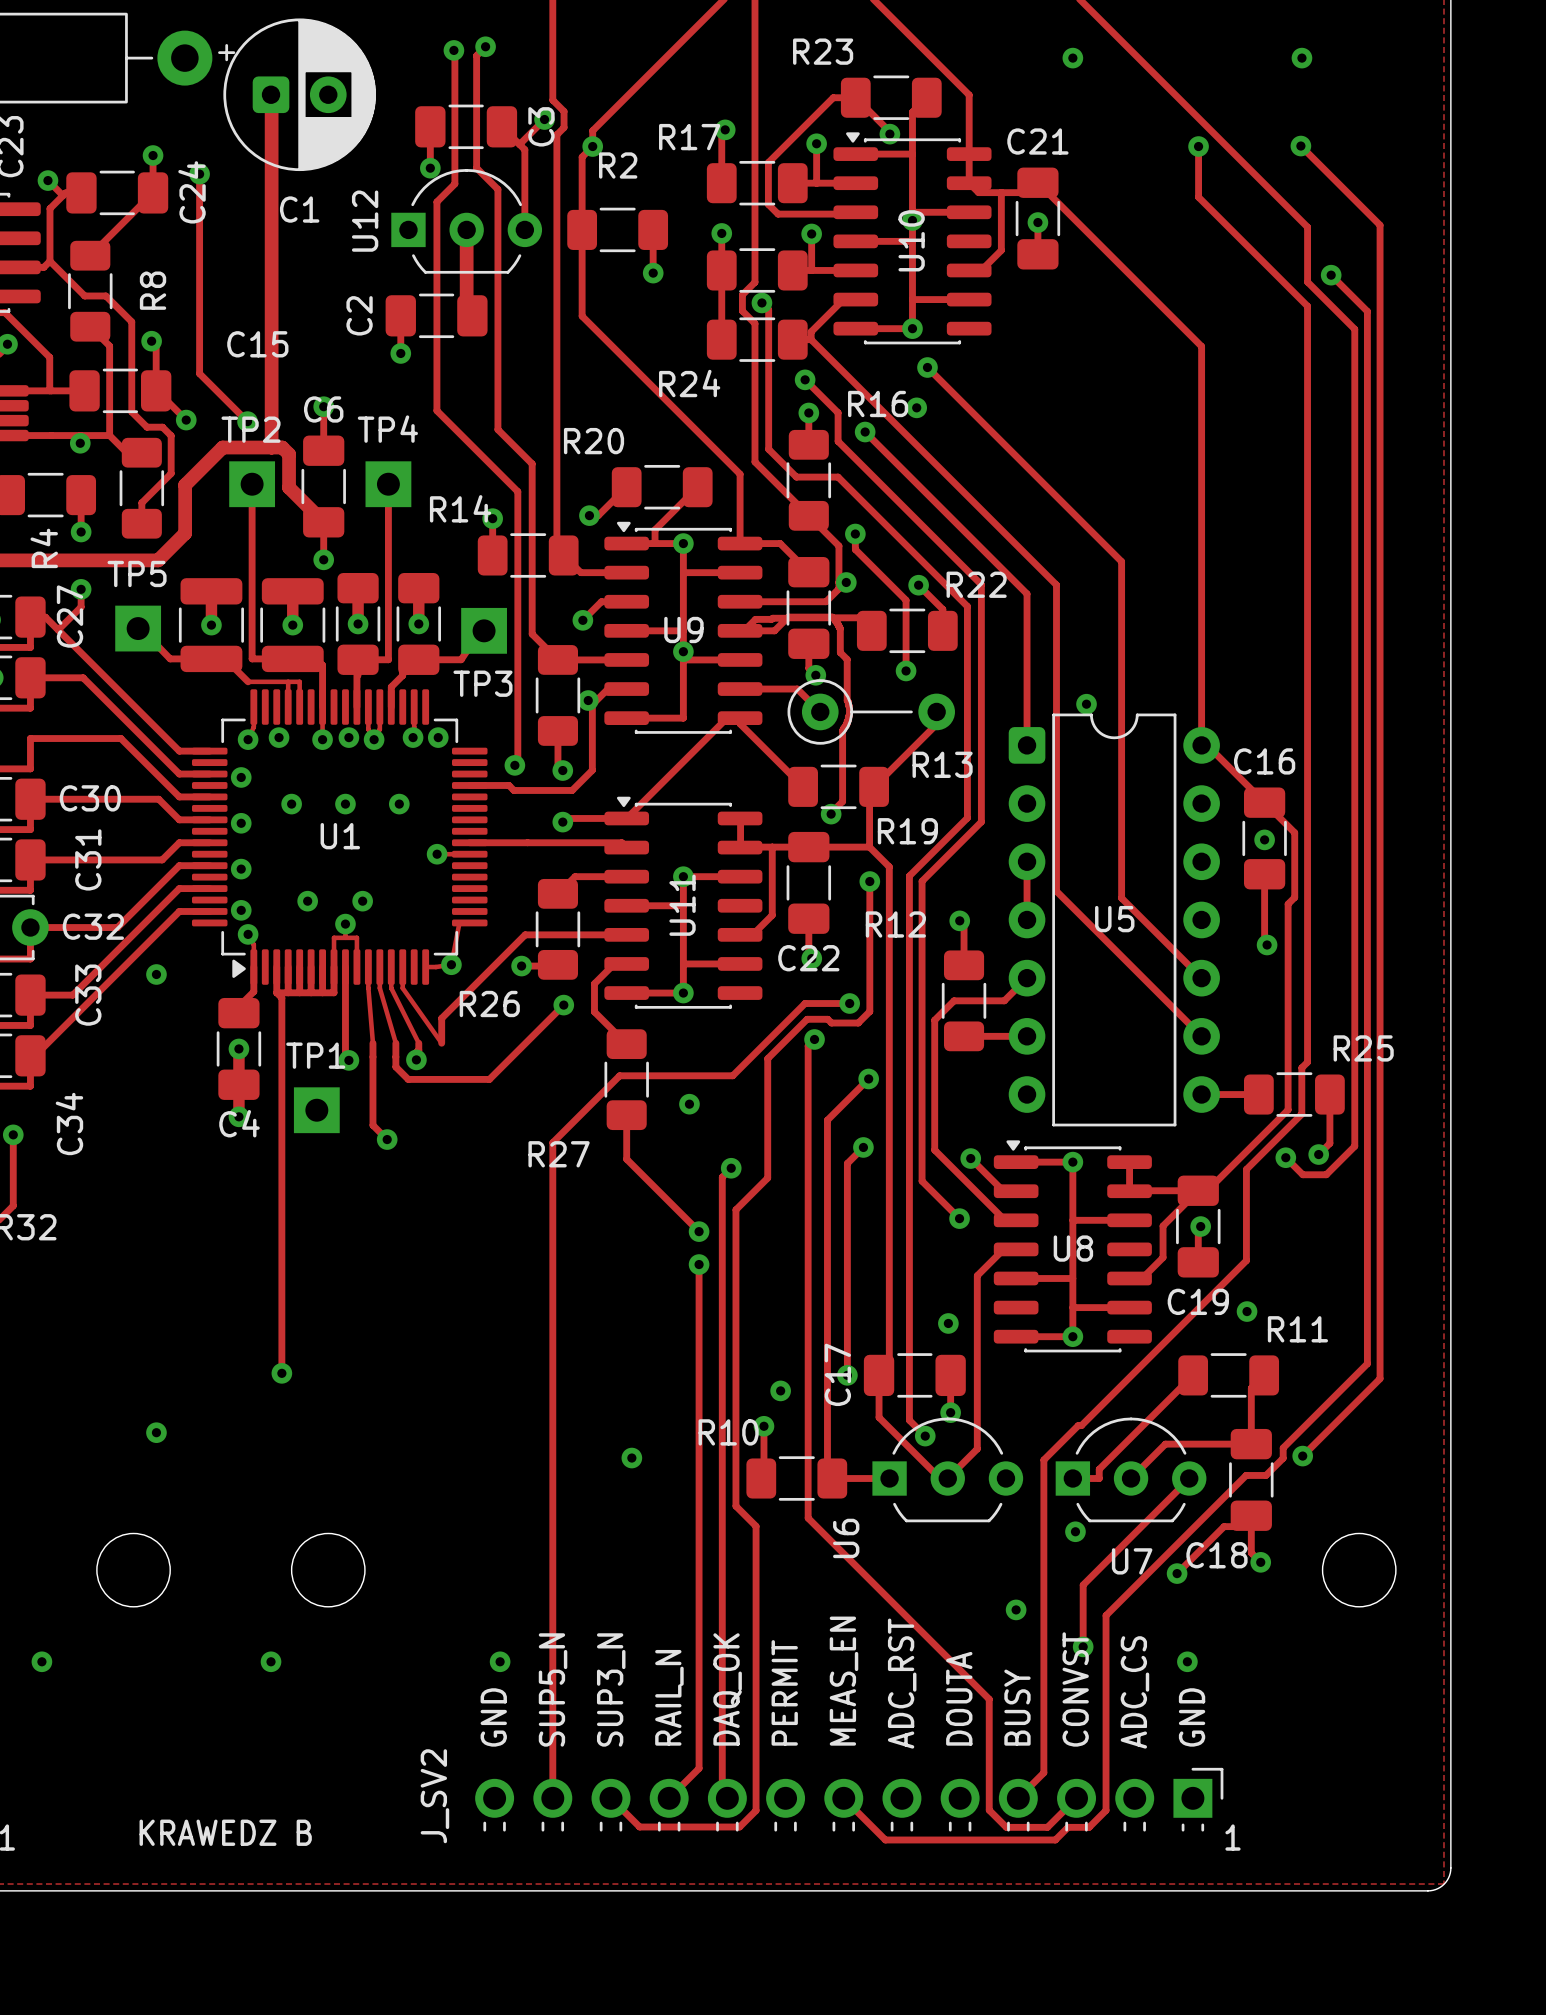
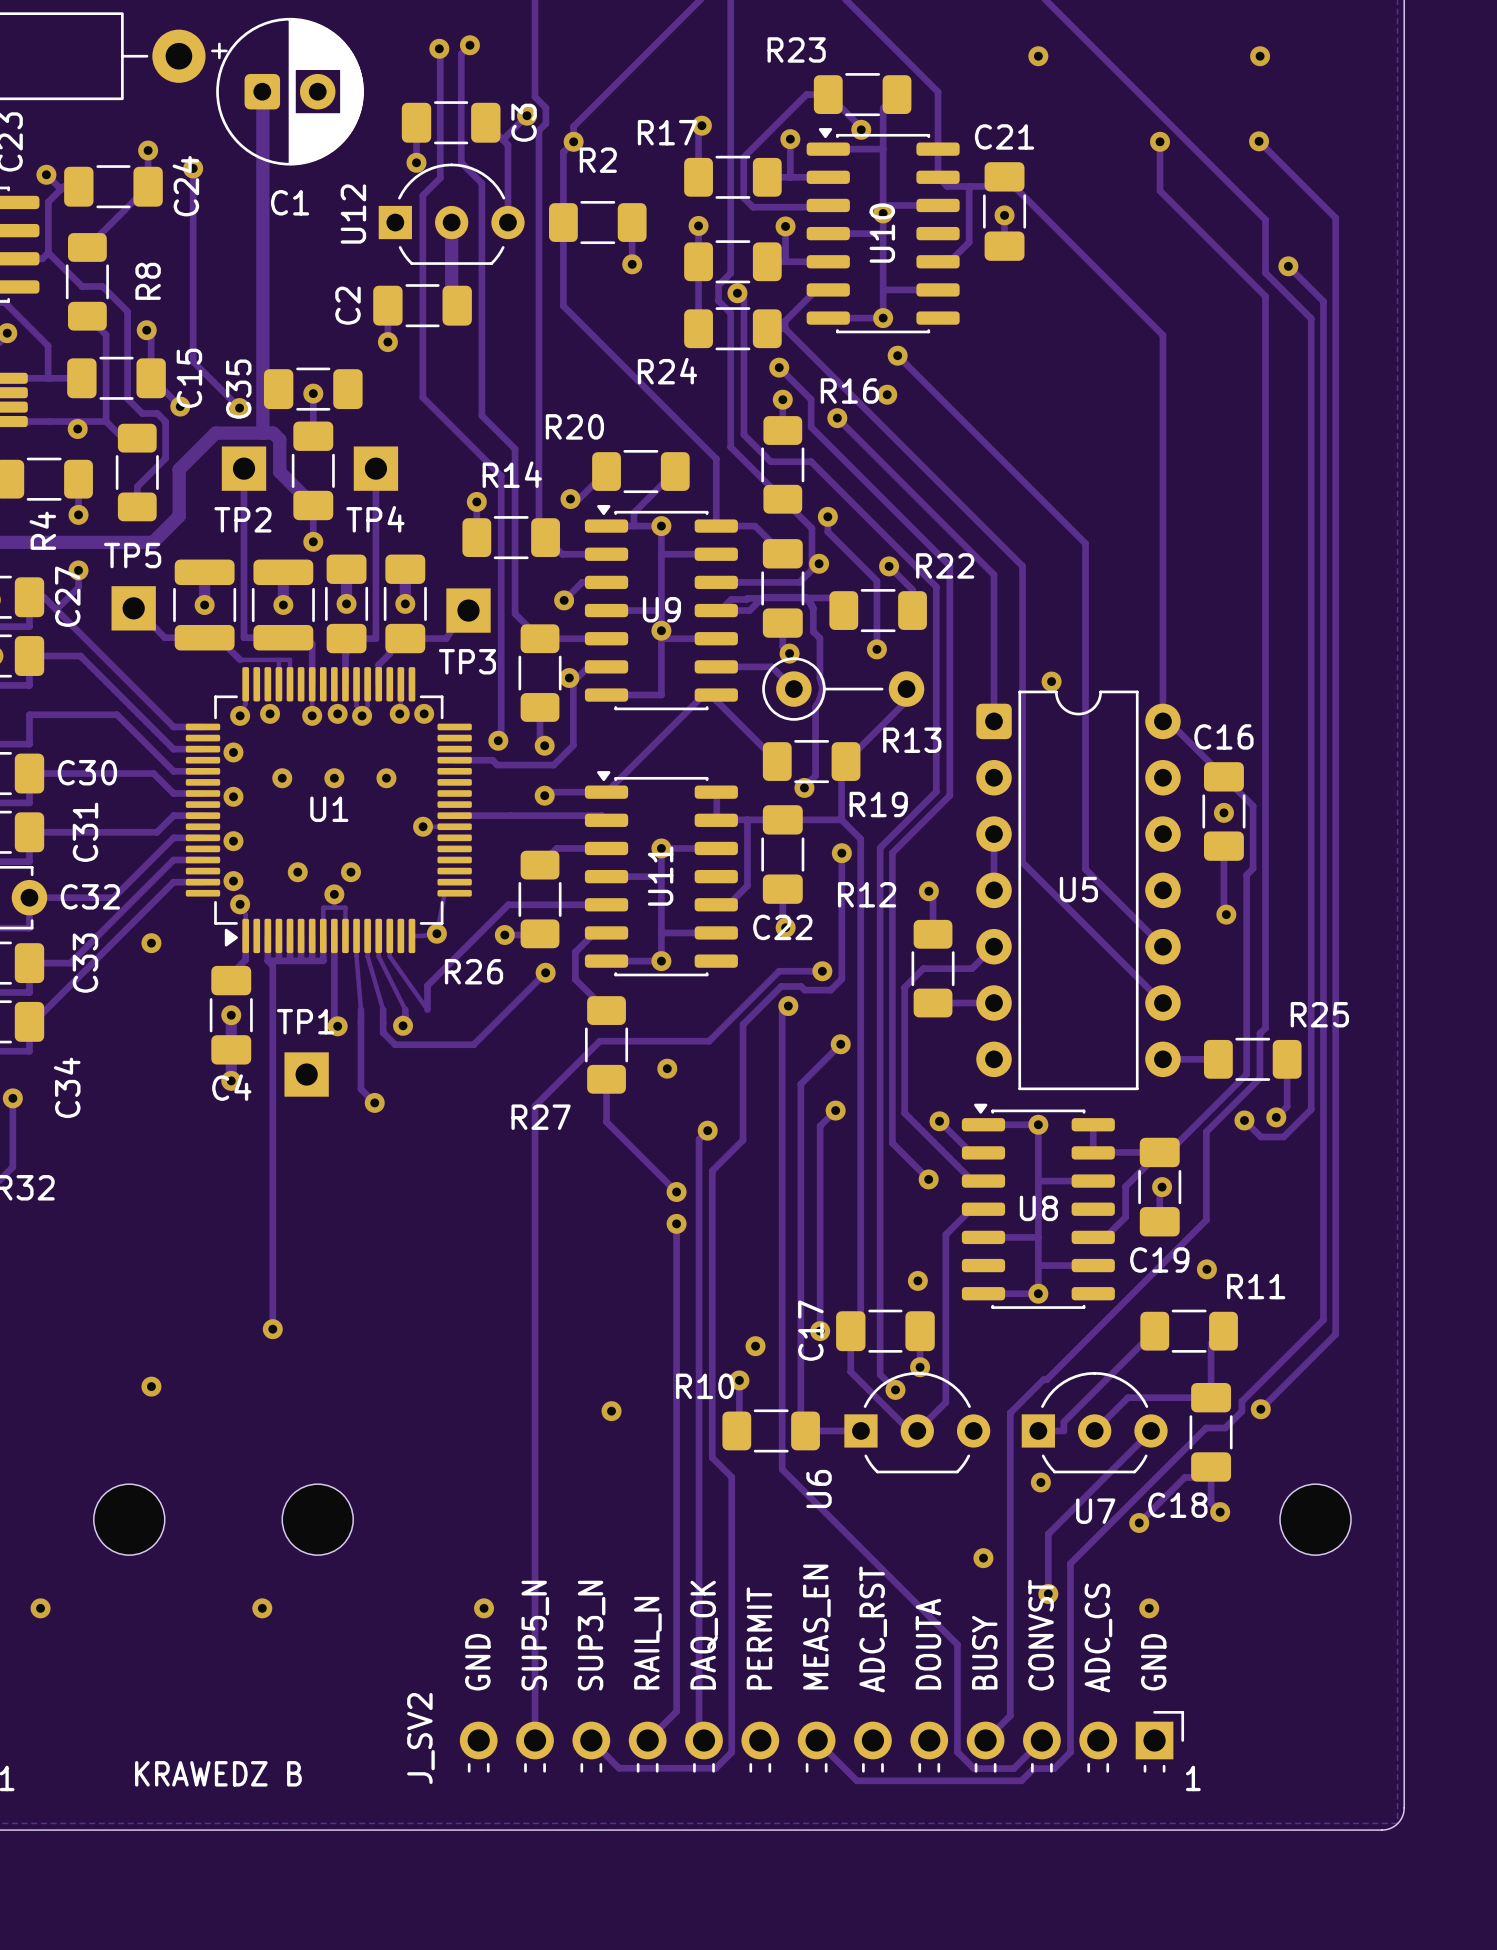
C15 name rotation: 0° (257, 344) -> 90° counterclockwise (189, 378)
C35: none -> (313, 389)
C6 name: C6 (323, 409) -> none
TP2 name position: TP2 (251, 429) -> TP2 (242, 519)
TP4 name position: TP4 (387, 429) -> TP4 (375, 519)
R14 name position: R14 (460, 508) -> R14 (512, 474)

